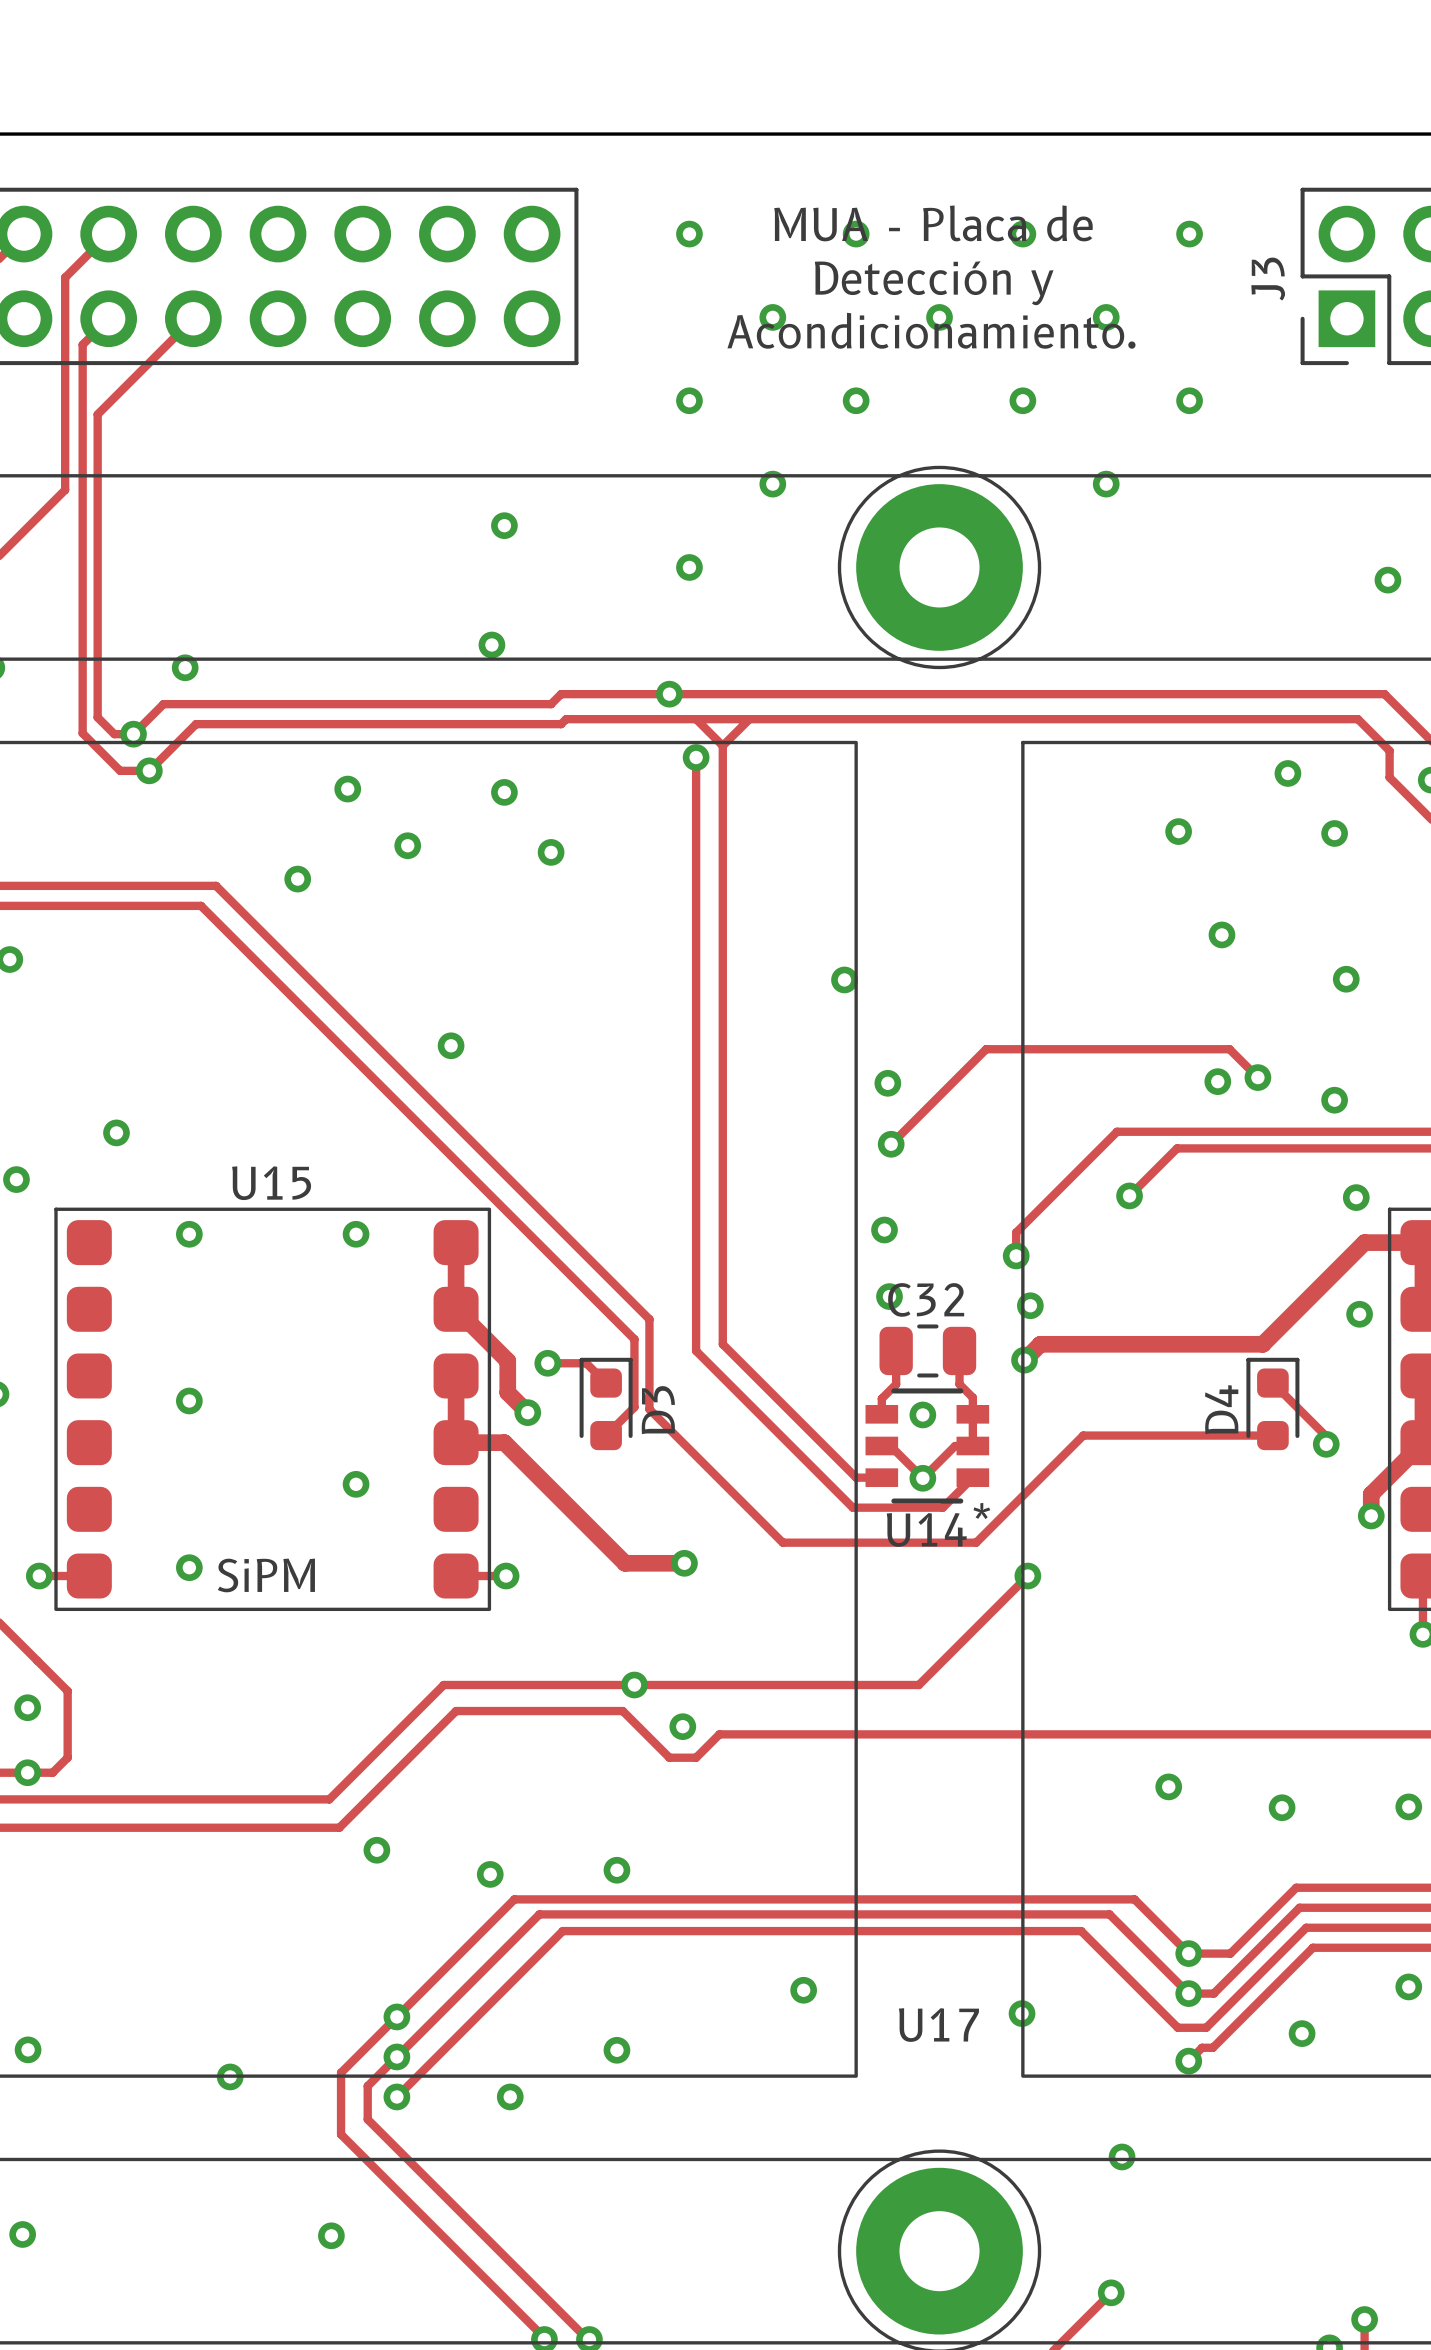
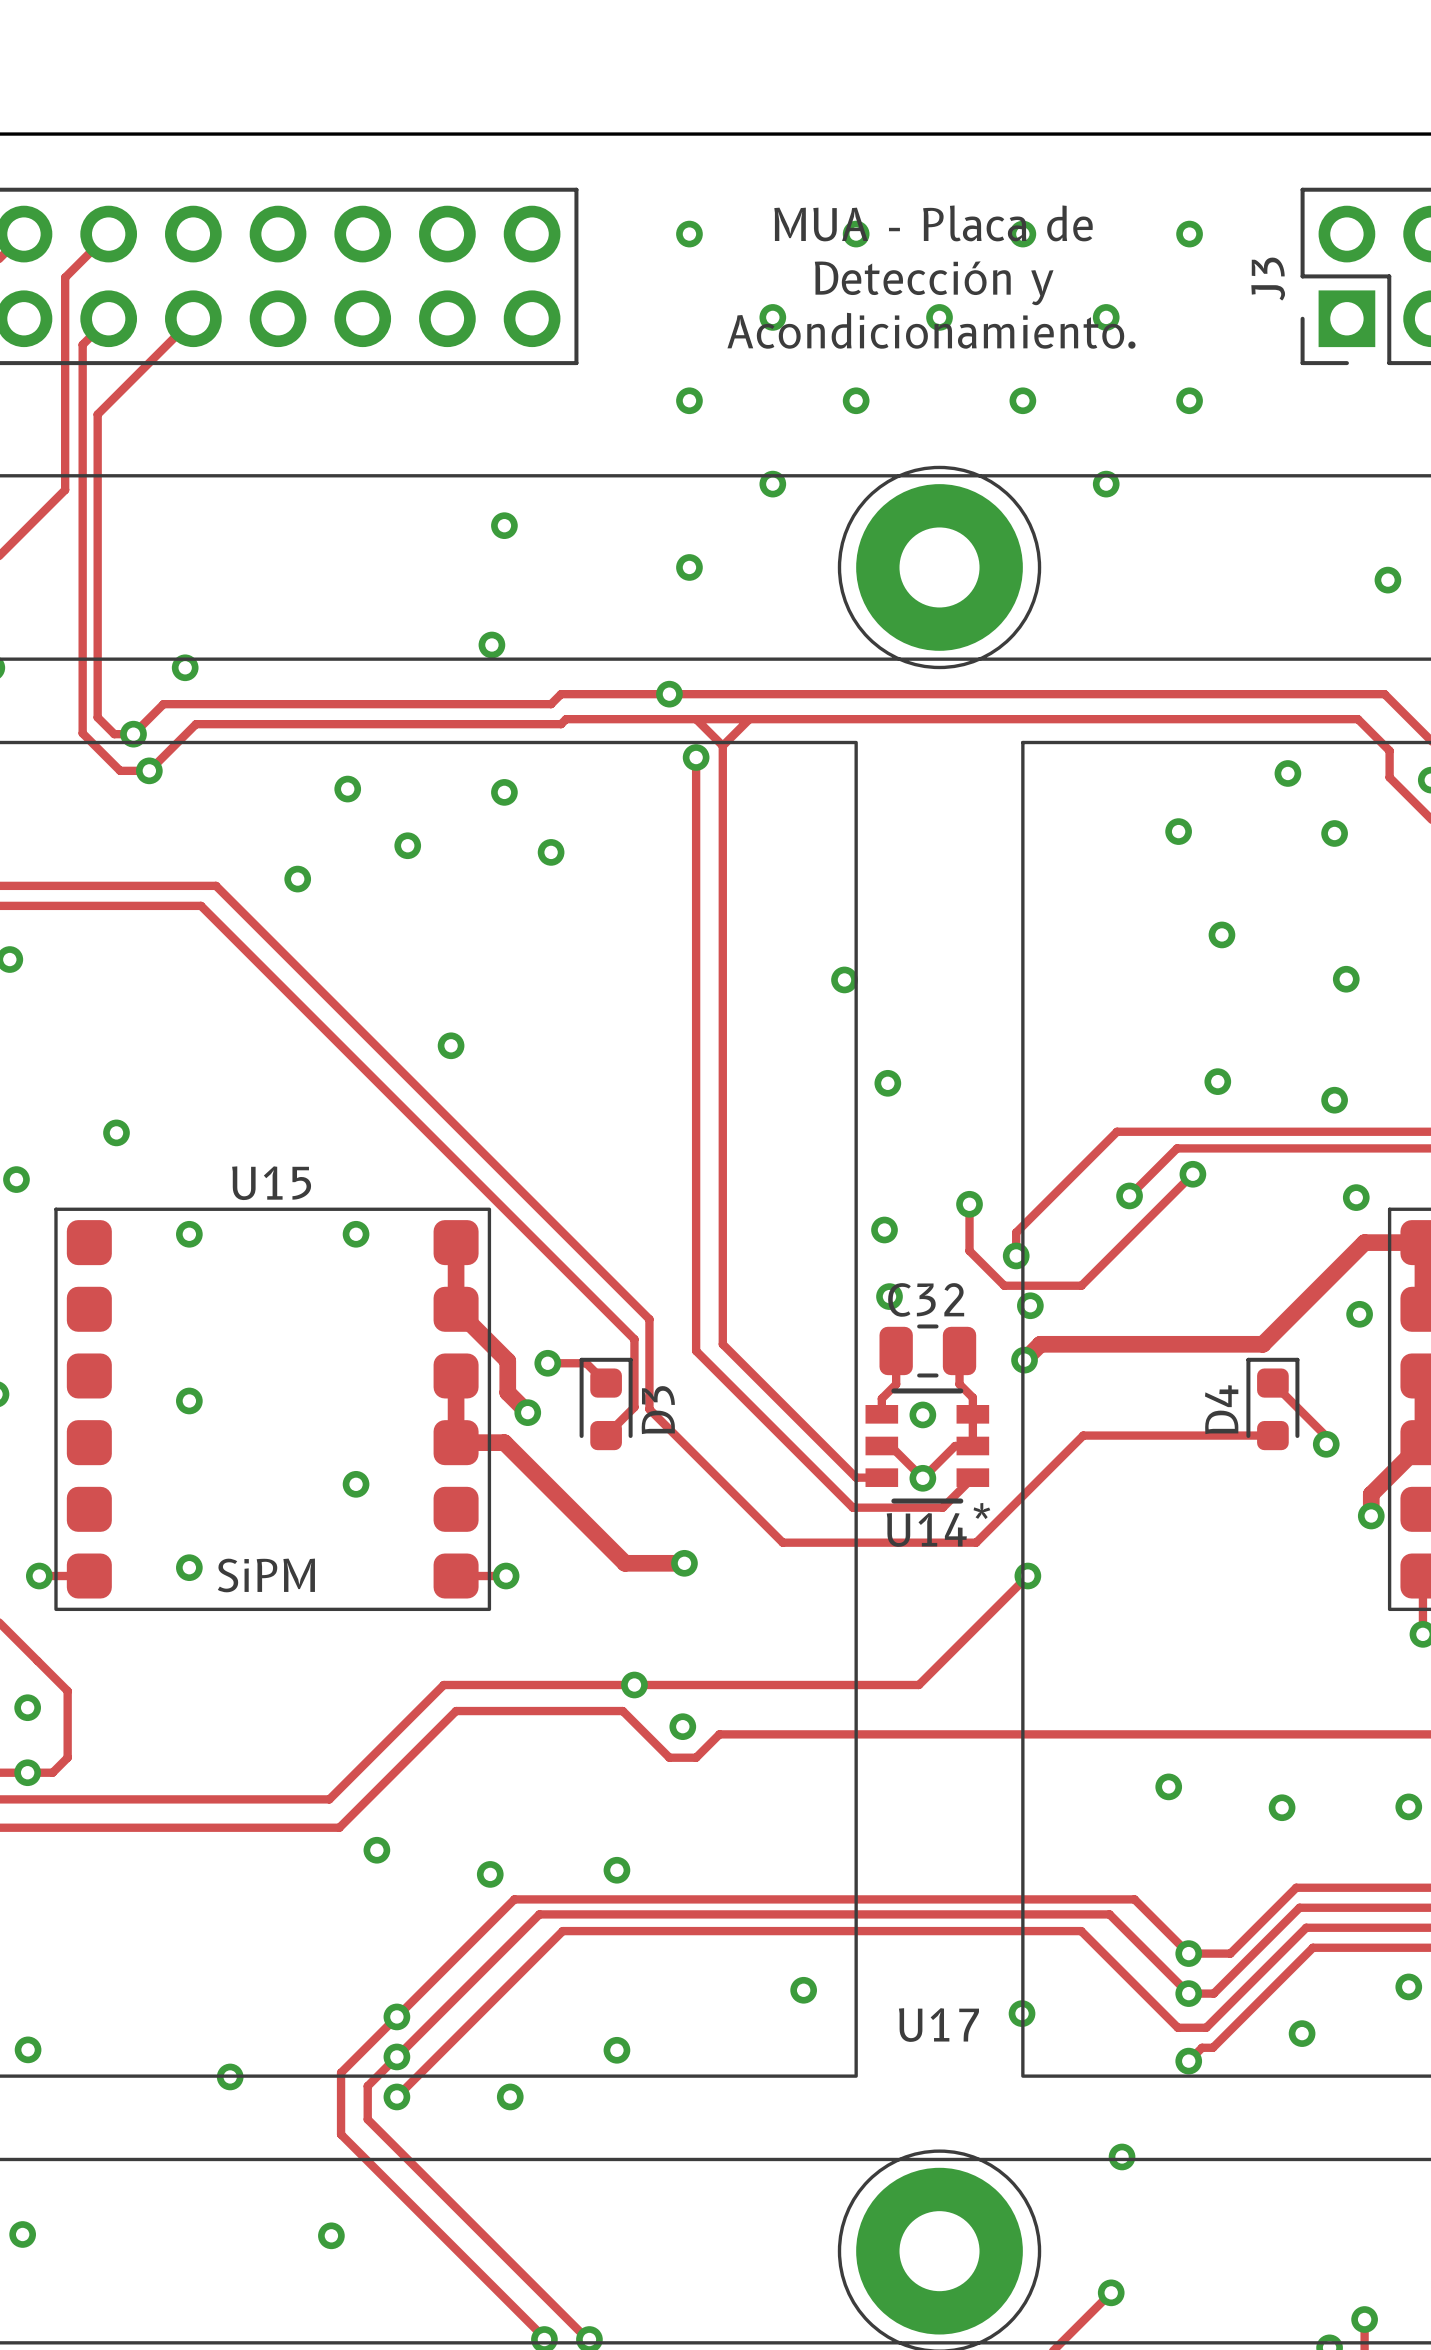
track: (1257, 1077) (1229, 1049) (986, 1049) (891, 1144) -> none
via position: (1257, 1077) -> (1192, 1174)
via position: (891, 1144) -> (969, 1204)
track: none -> (1192, 1174) (1081, 1285) (1004, 1285) (969, 1250) (969, 1204)

